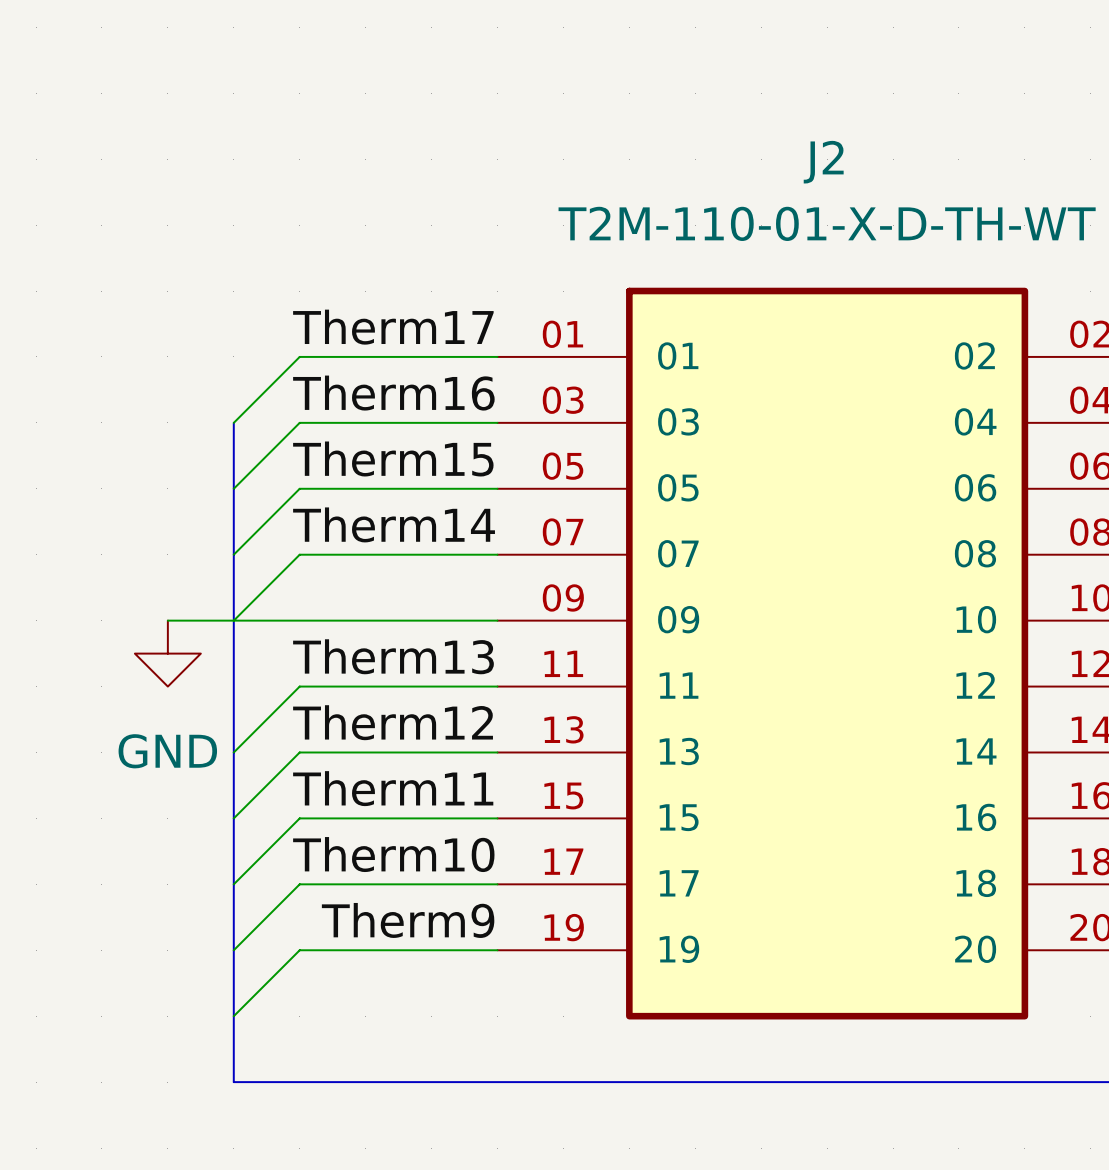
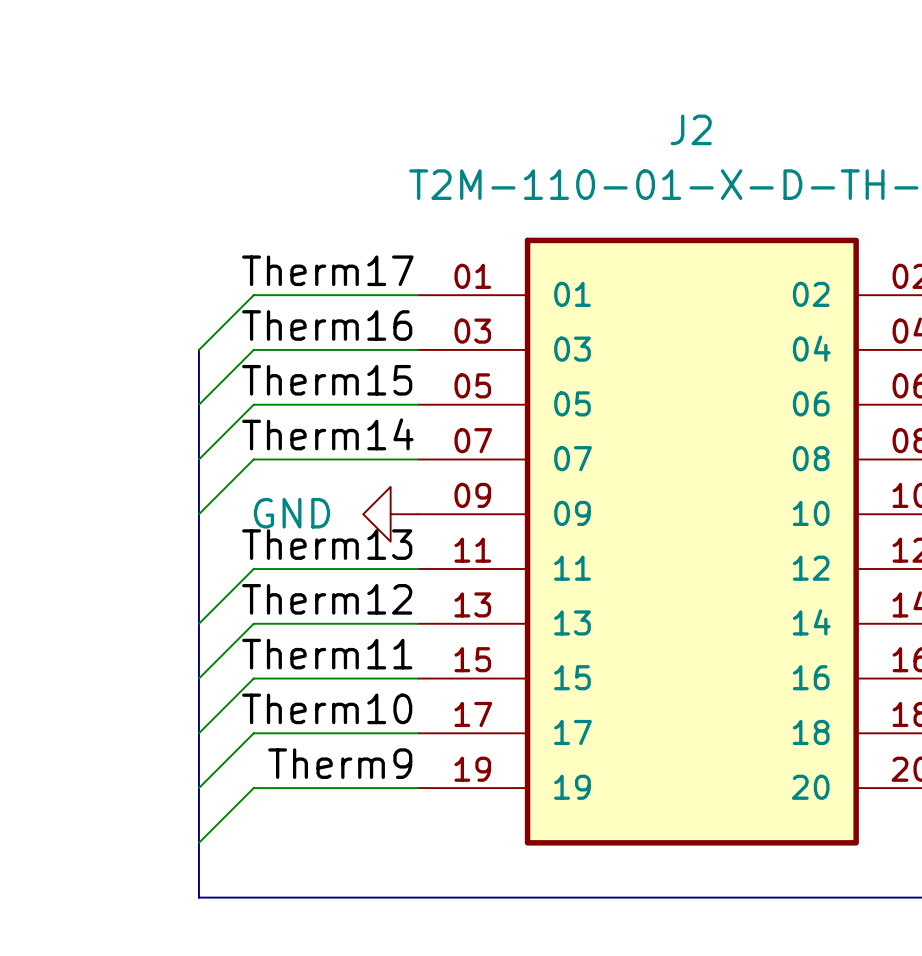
wire: (167, 620) (497, 620) -> none
power symbol rotation: 0° (167, 653) -> 90° clockwise (390, 514)
power symbol position: GND (167, 653) -> GND (390, 514)

